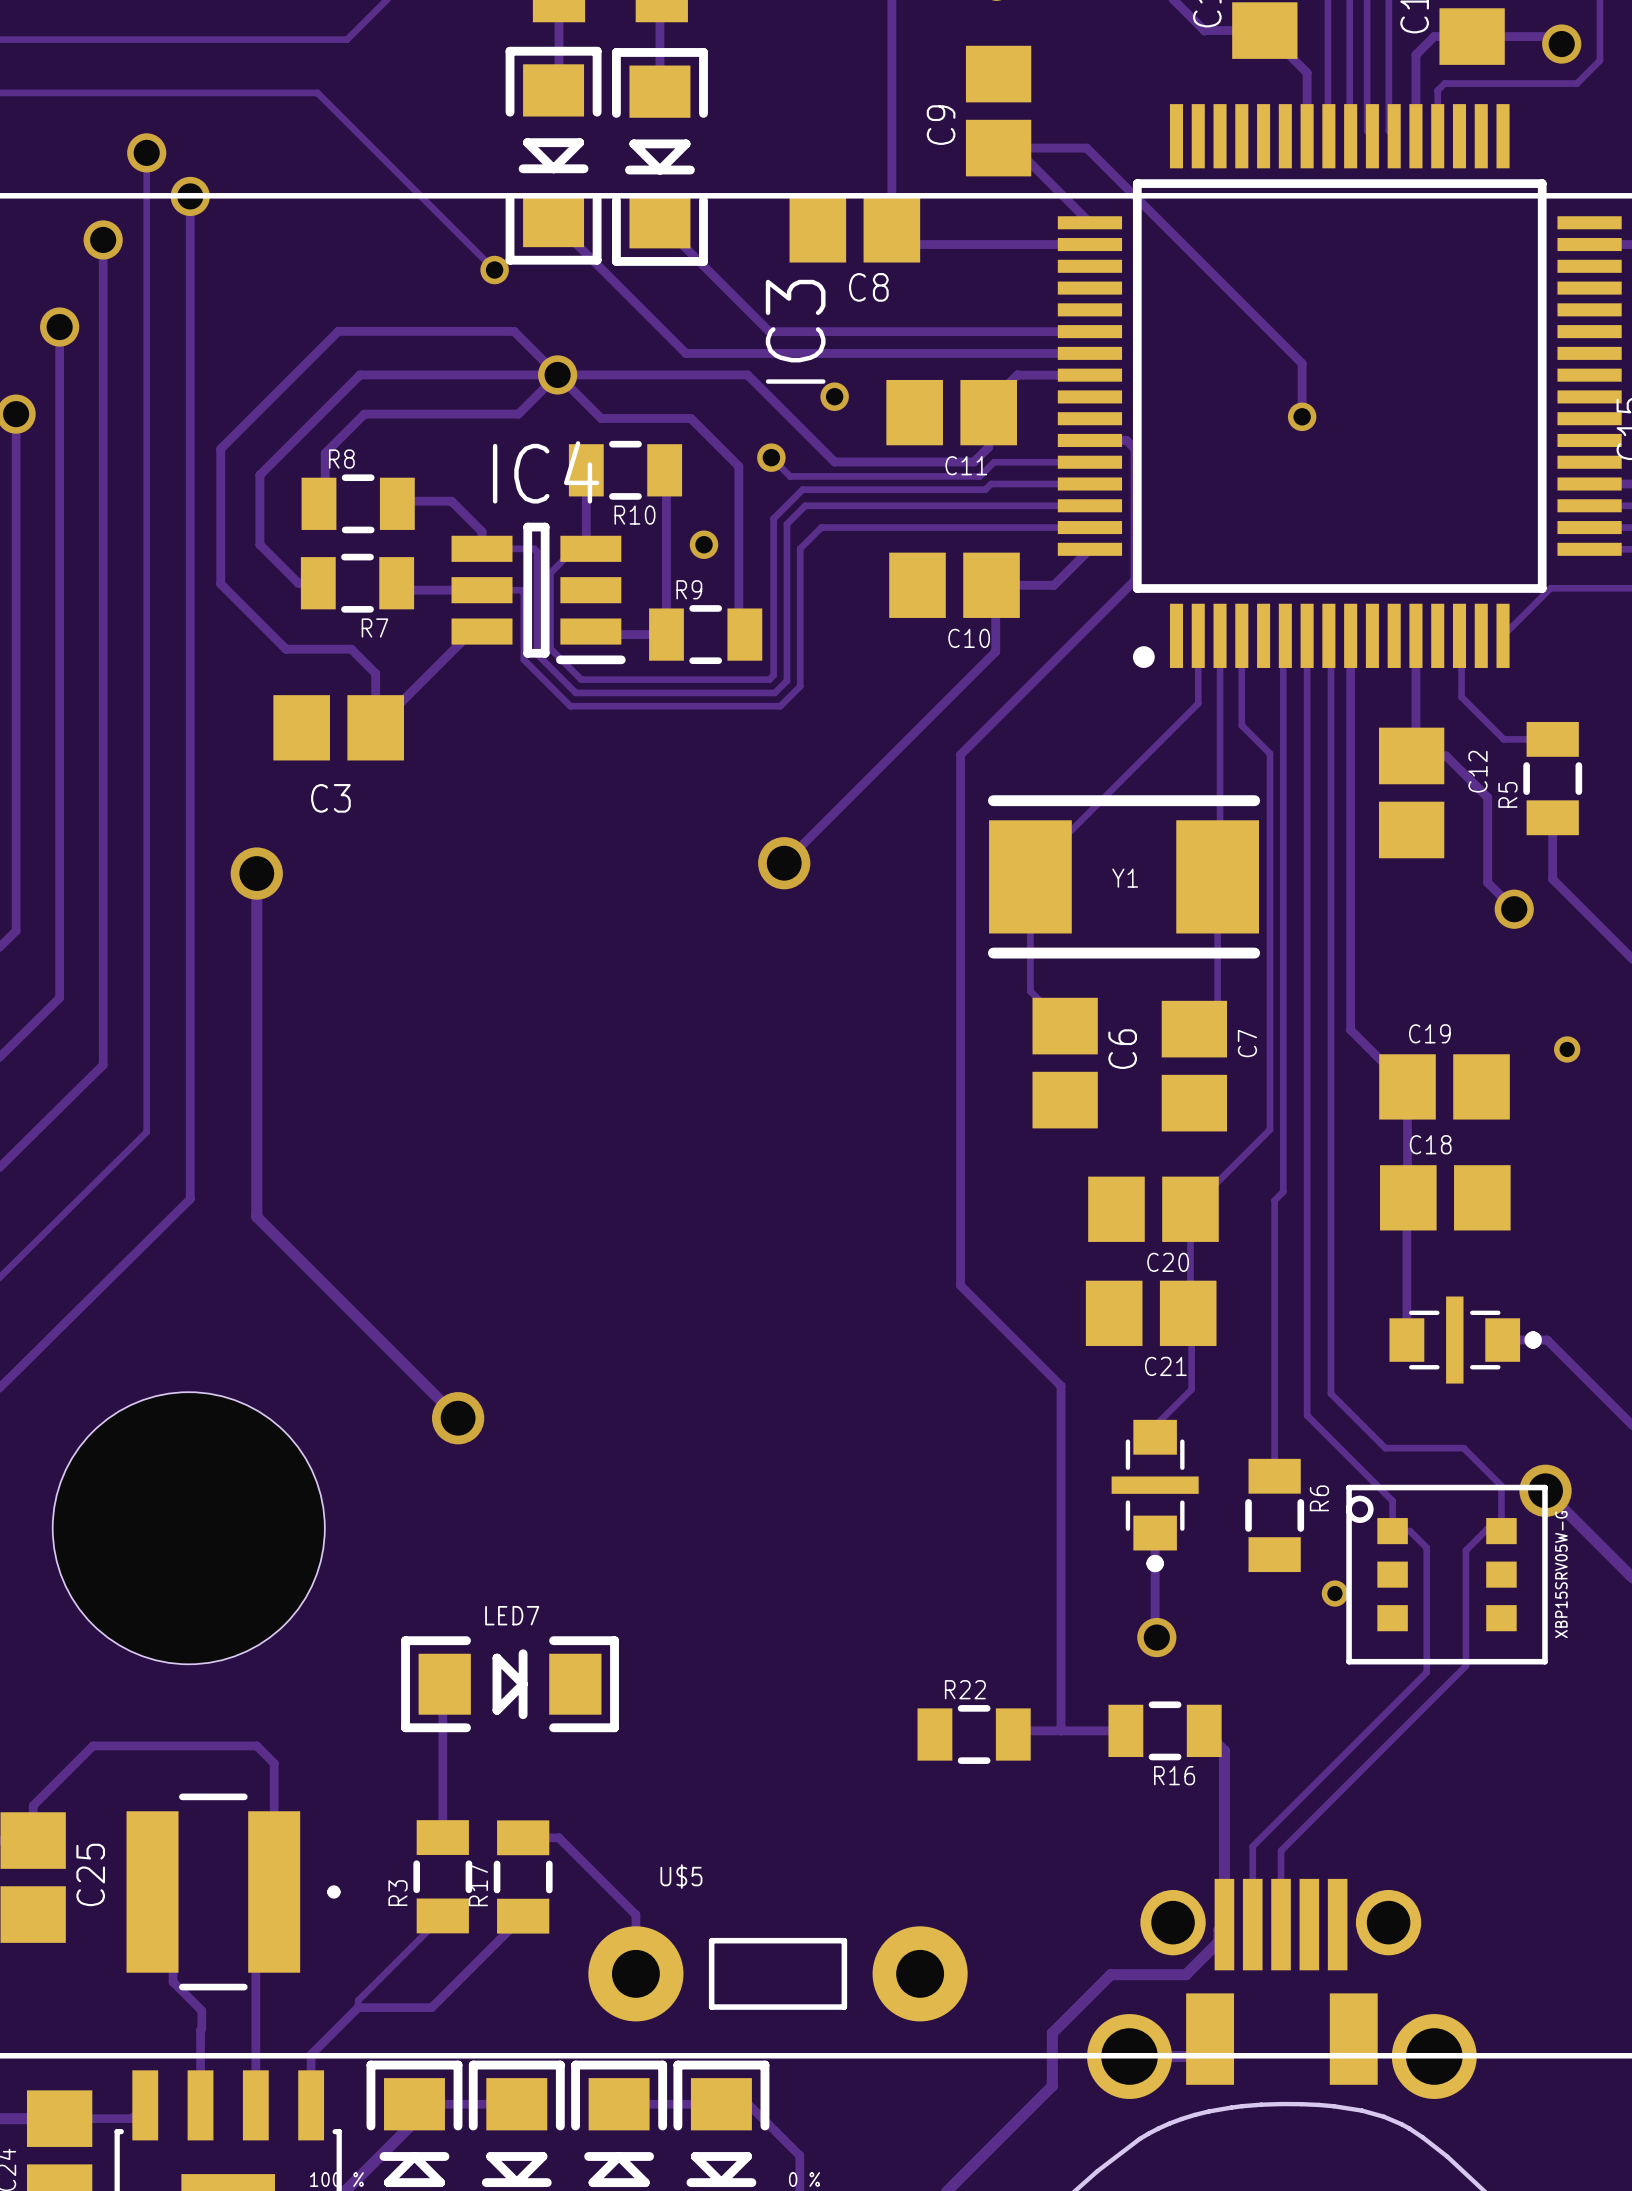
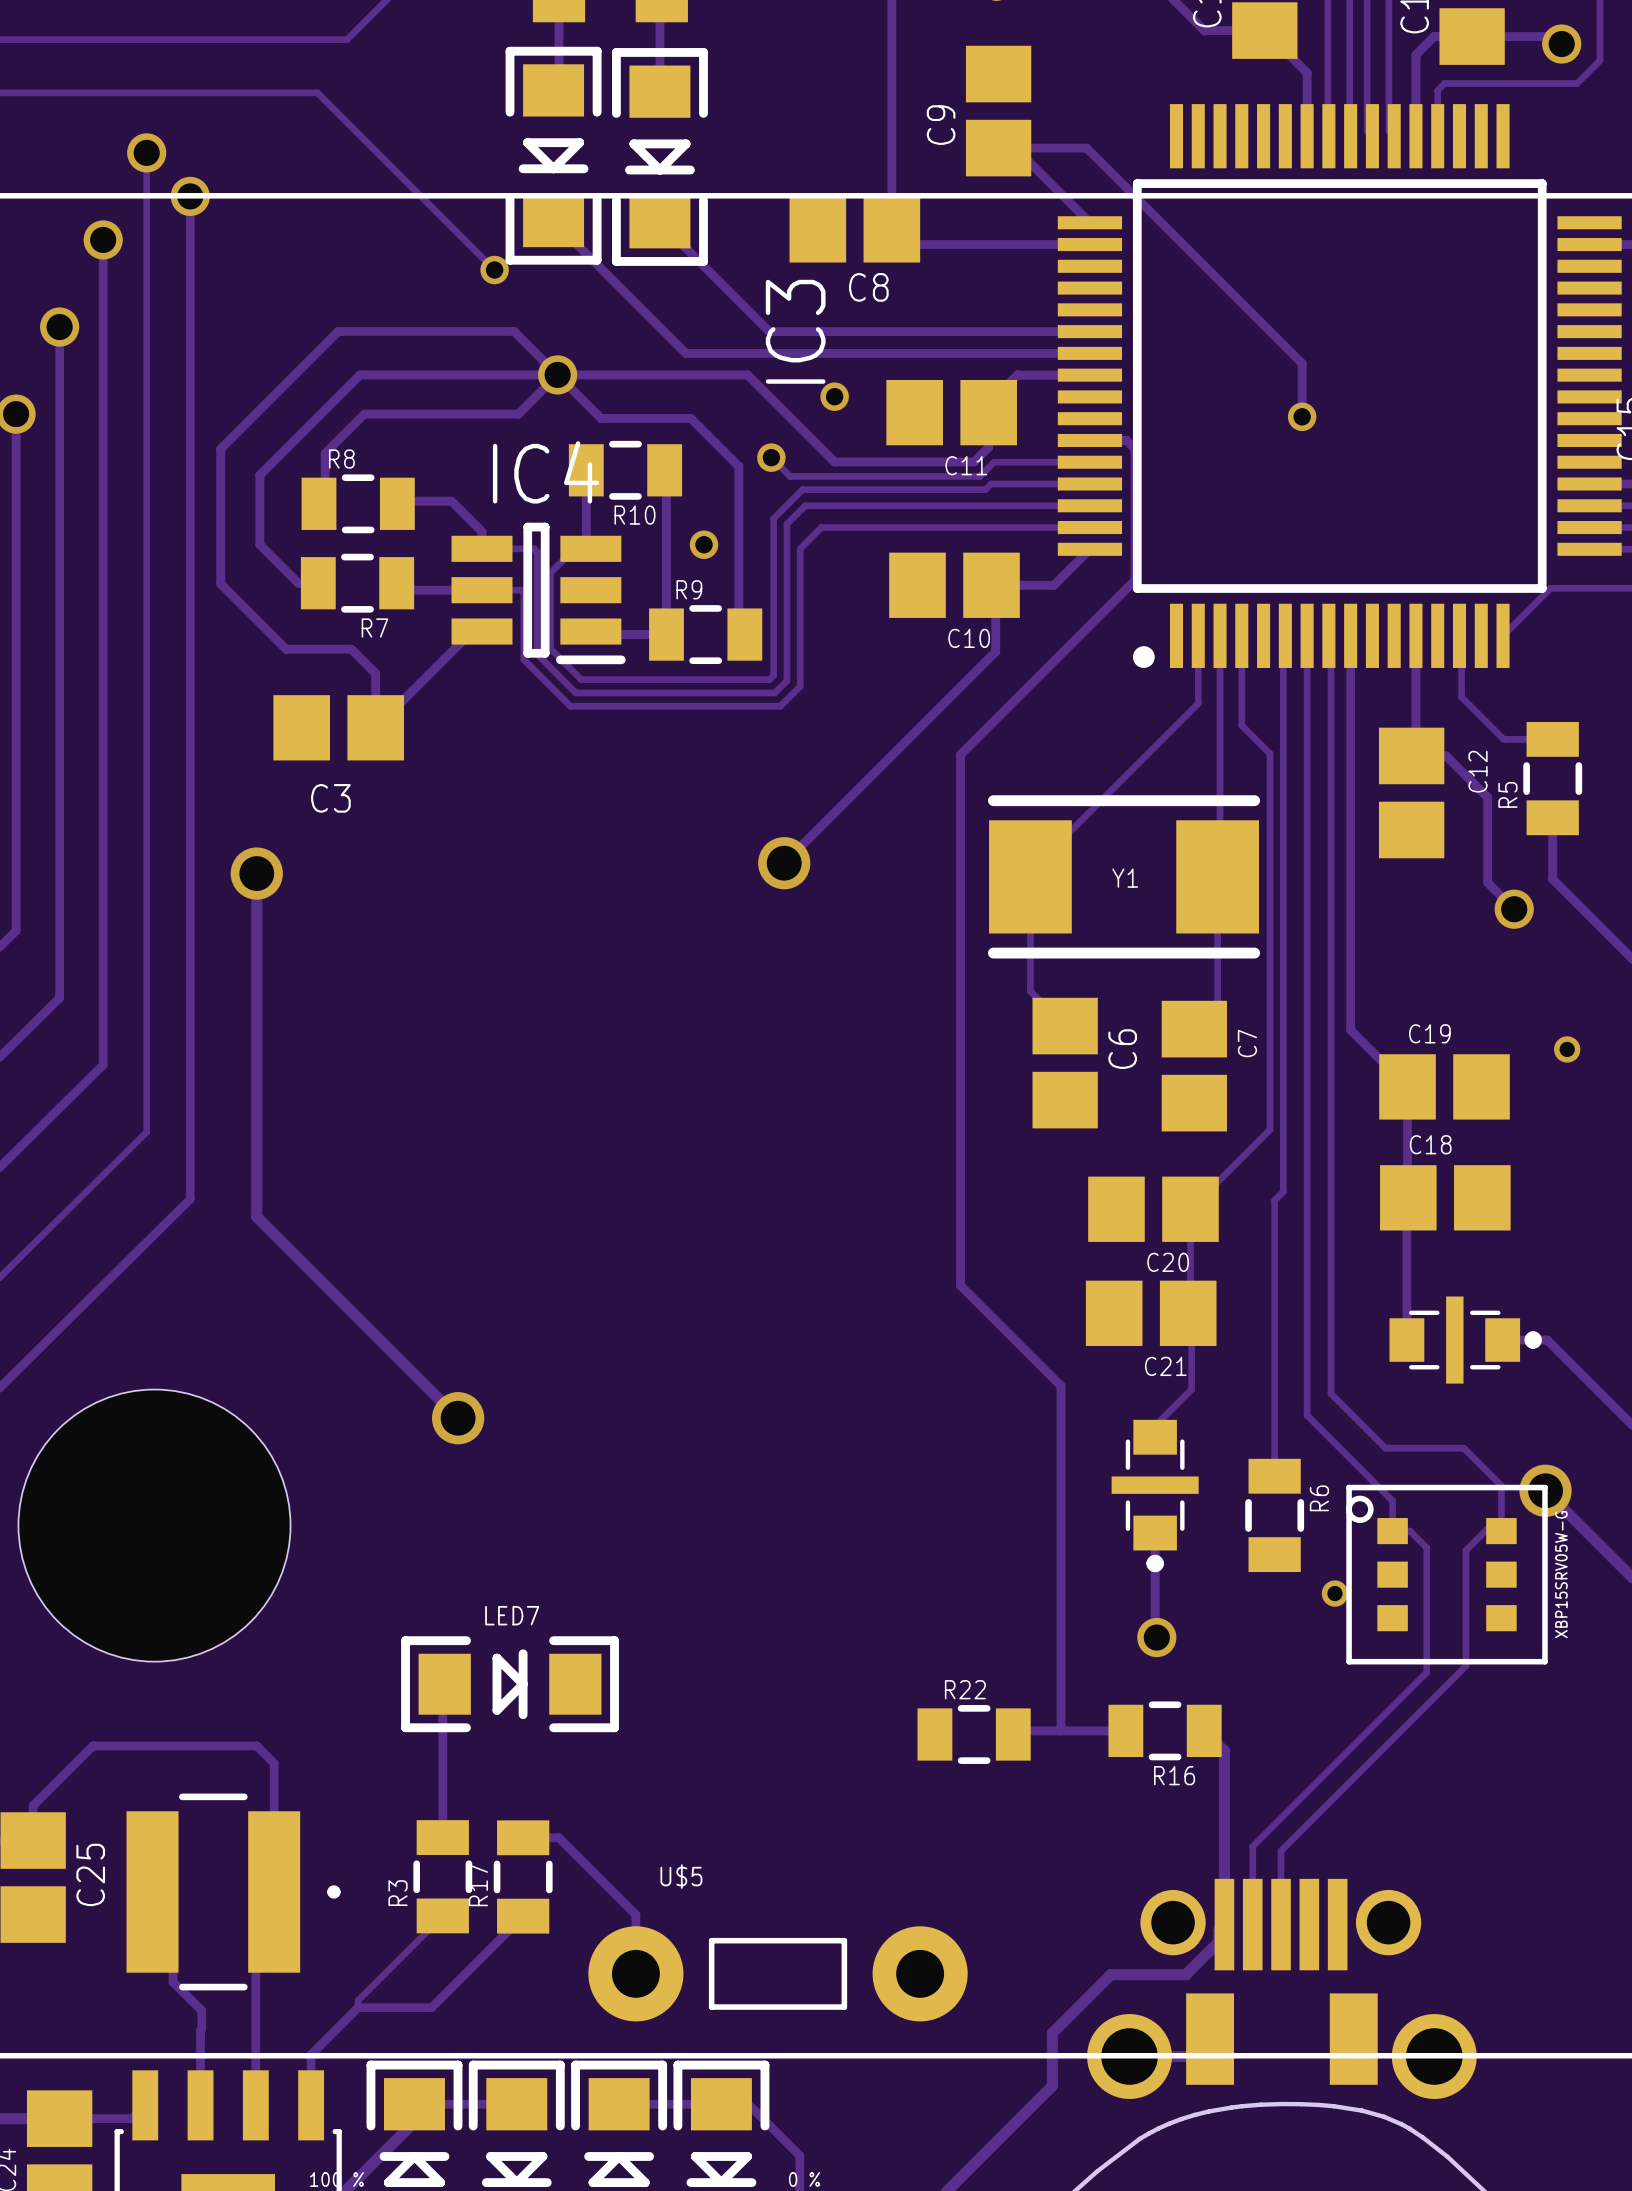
hole position: (188, 1528) -> (154, 1525)

